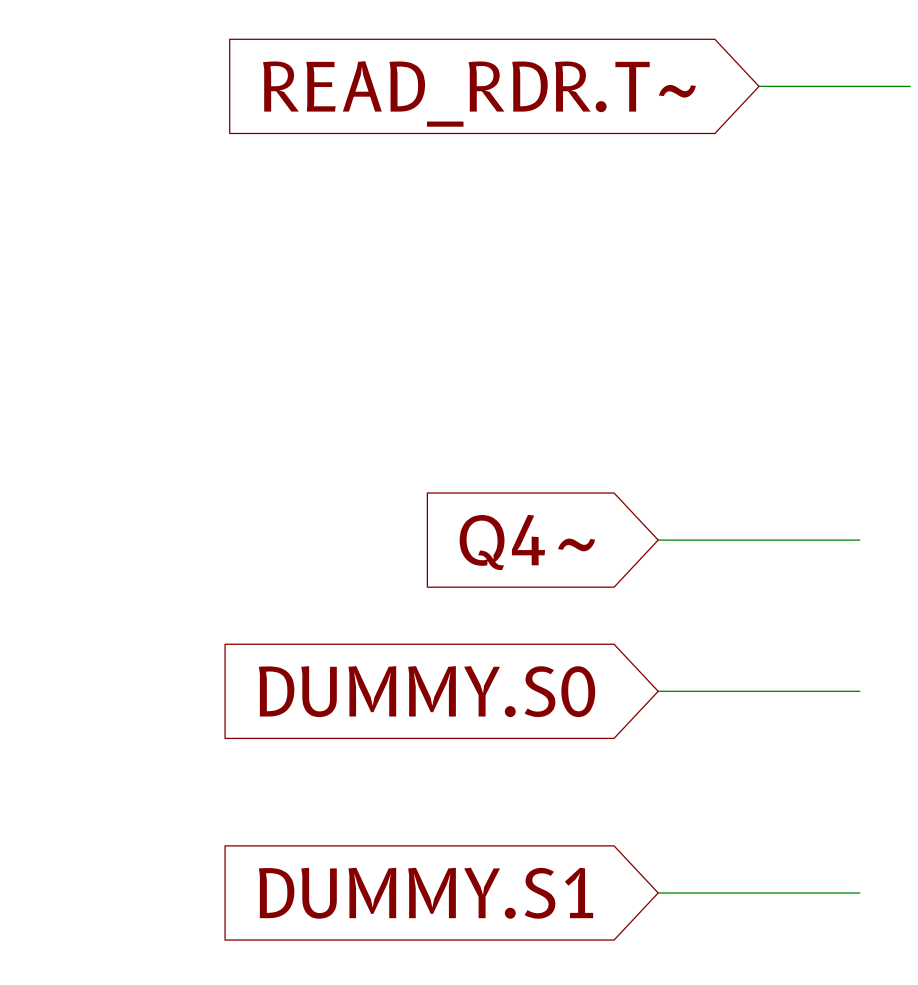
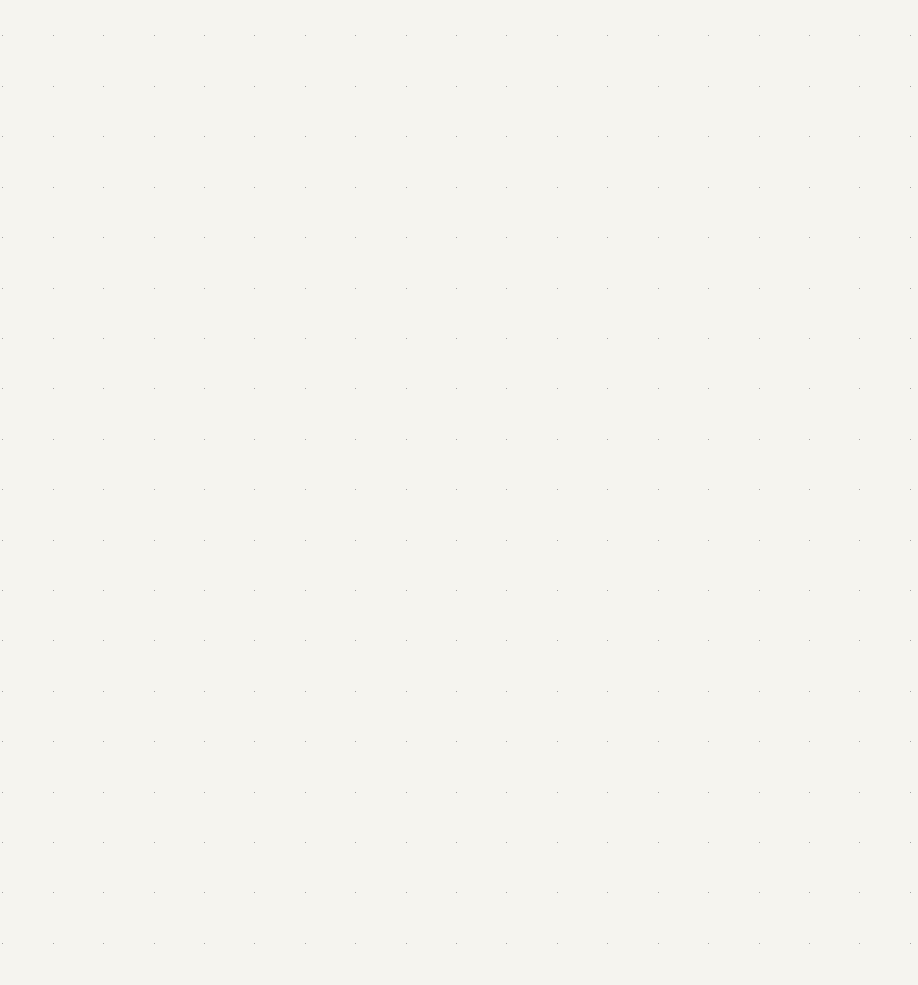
wire: (759, 86) (910, 86) -> none
global label: READ_RDR.T~ (479, 93) -> none
wire: (658, 540) (859, 540) -> none
global label: Q4~ (527, 542) -> none
global label: DUMMY.S0 (427, 691) -> none
wire: (658, 691) (859, 691) -> none
wire: (658, 892) (859, 892) -> none
global label: DUMMY.S1 (426, 893) -> none

